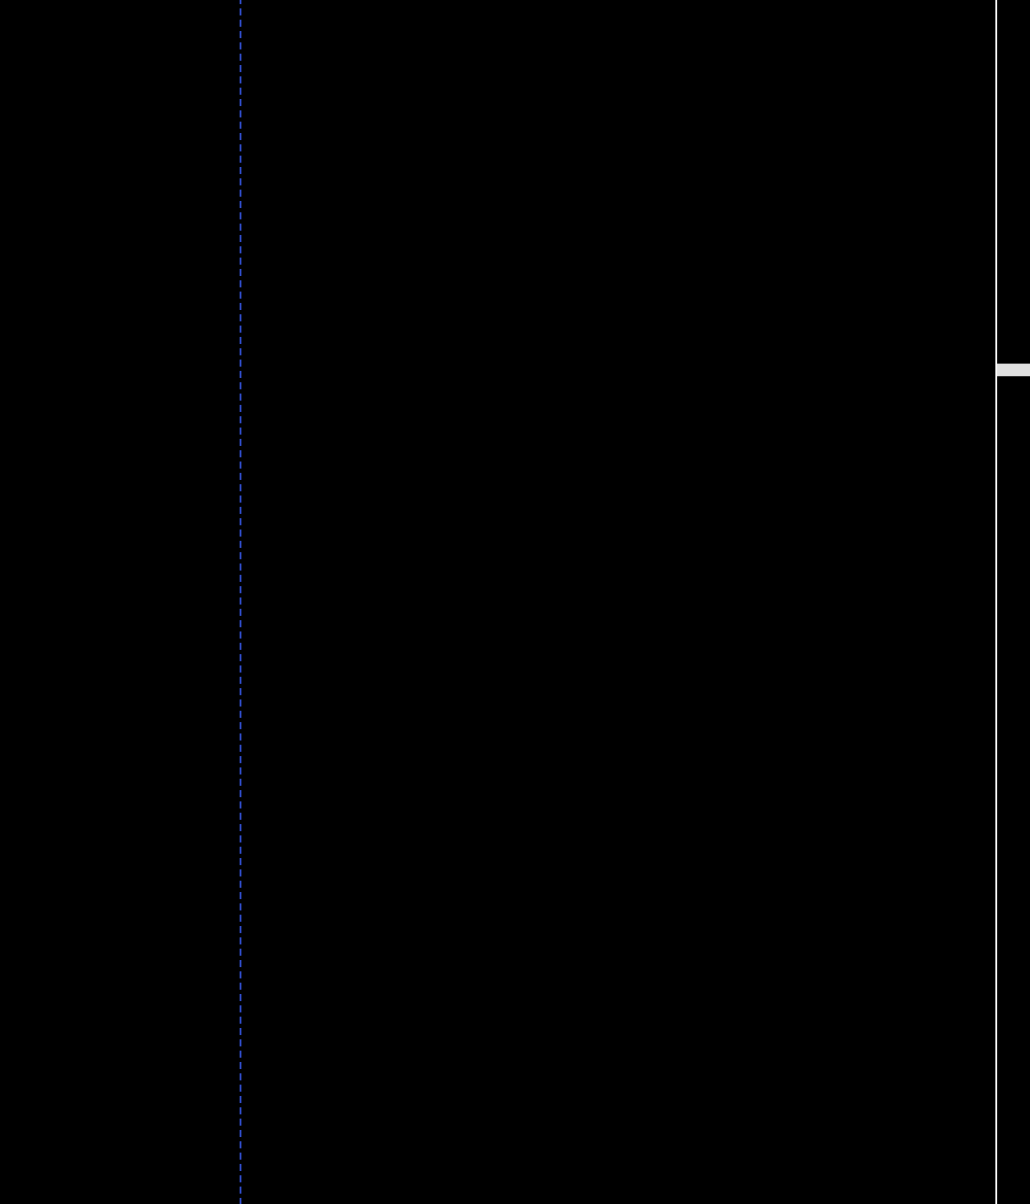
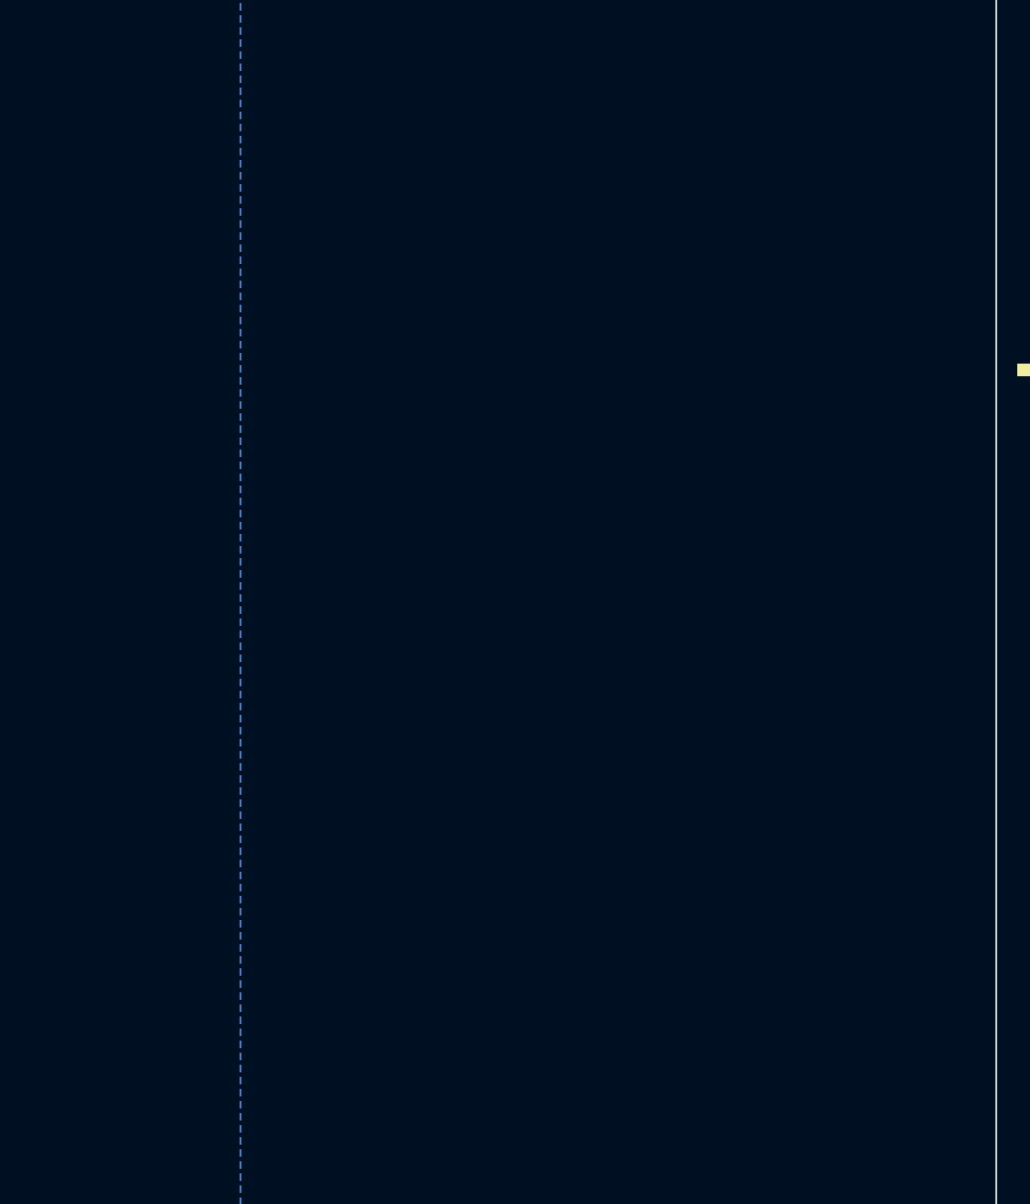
line: (1017, 369) (996, 369) -> none

